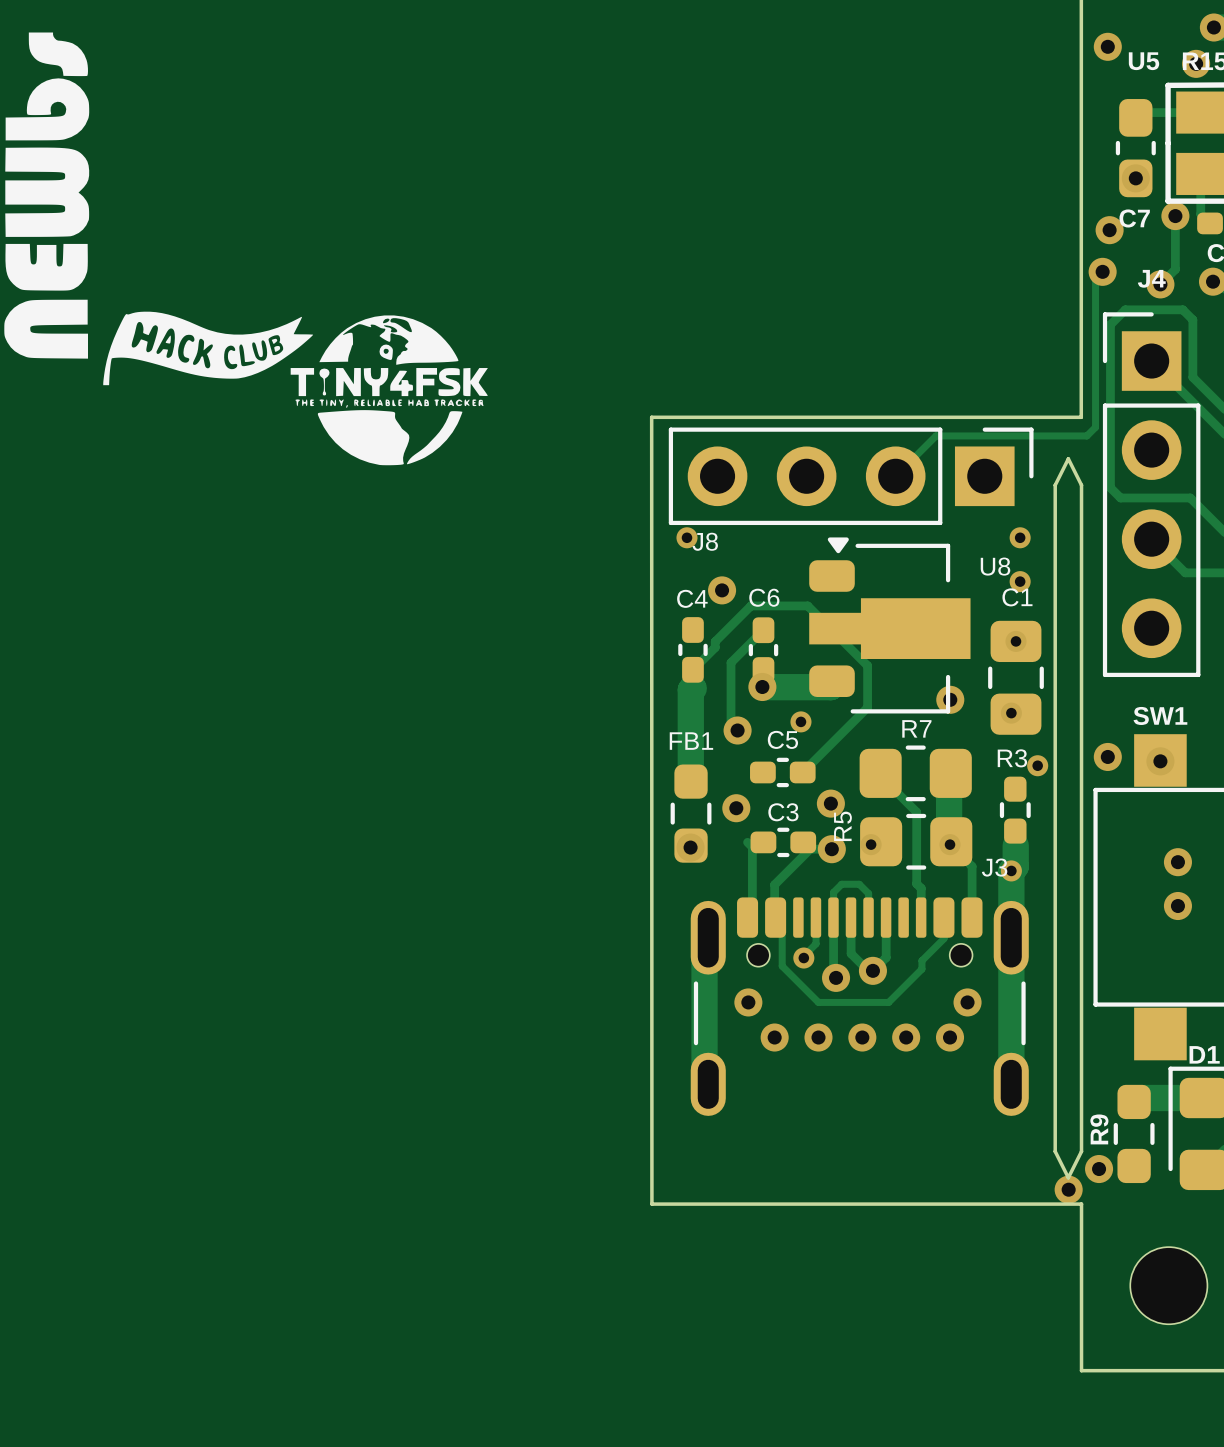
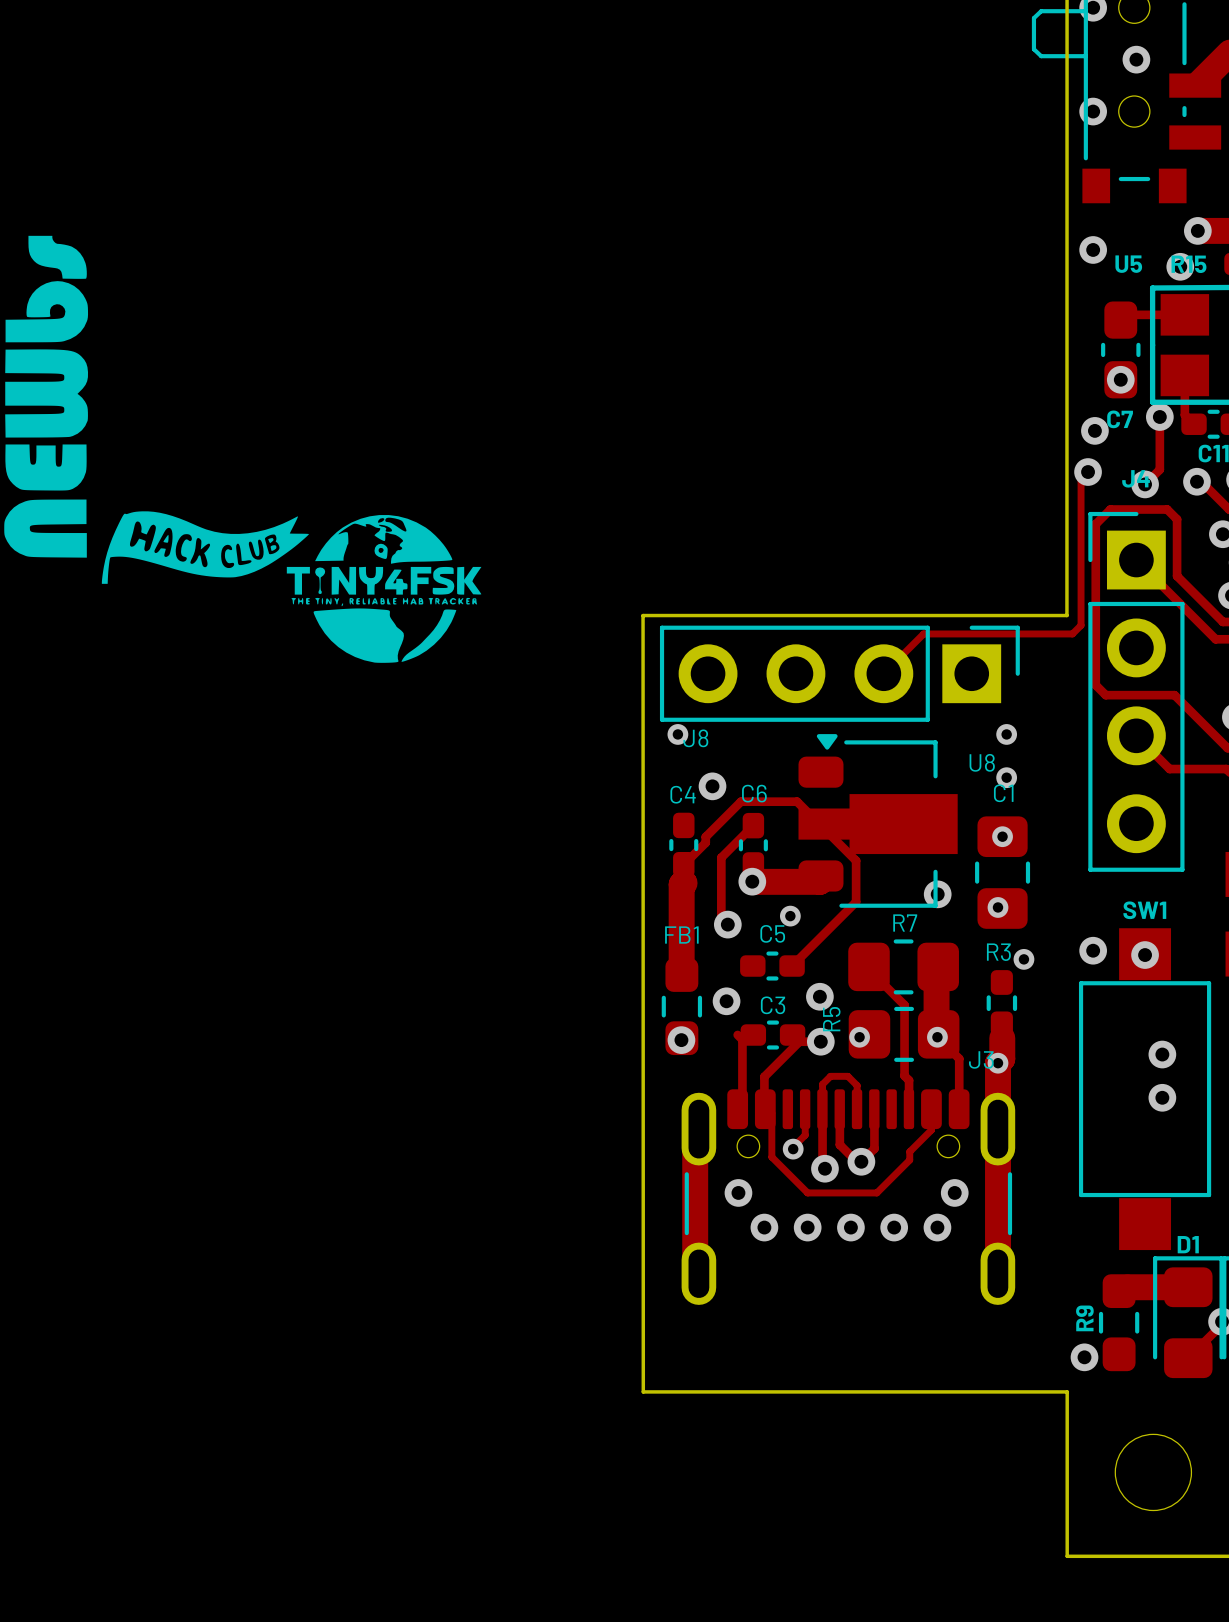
board edge: (1068, 458) (1055, 485) (1055, 1151) (1068, 1177) (1081, 1151) (1081, 485) (1068, 458) -> none
via: (1068, 1189) -> none

